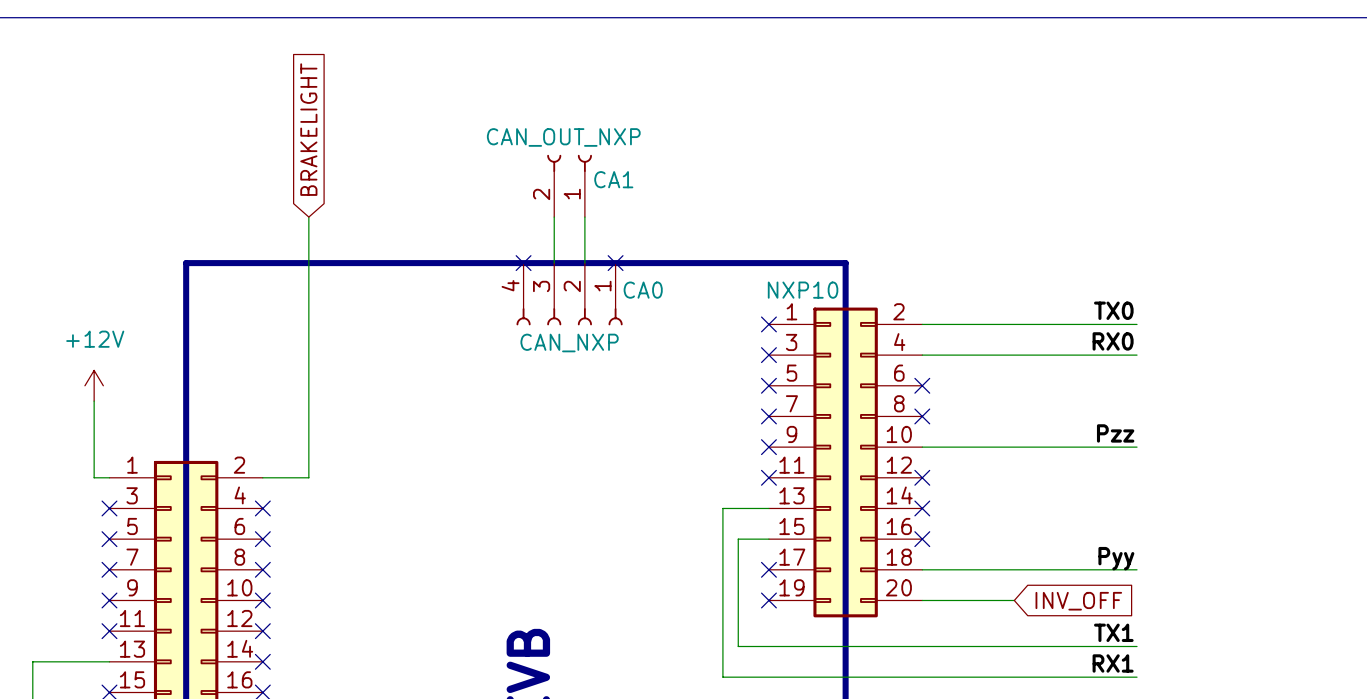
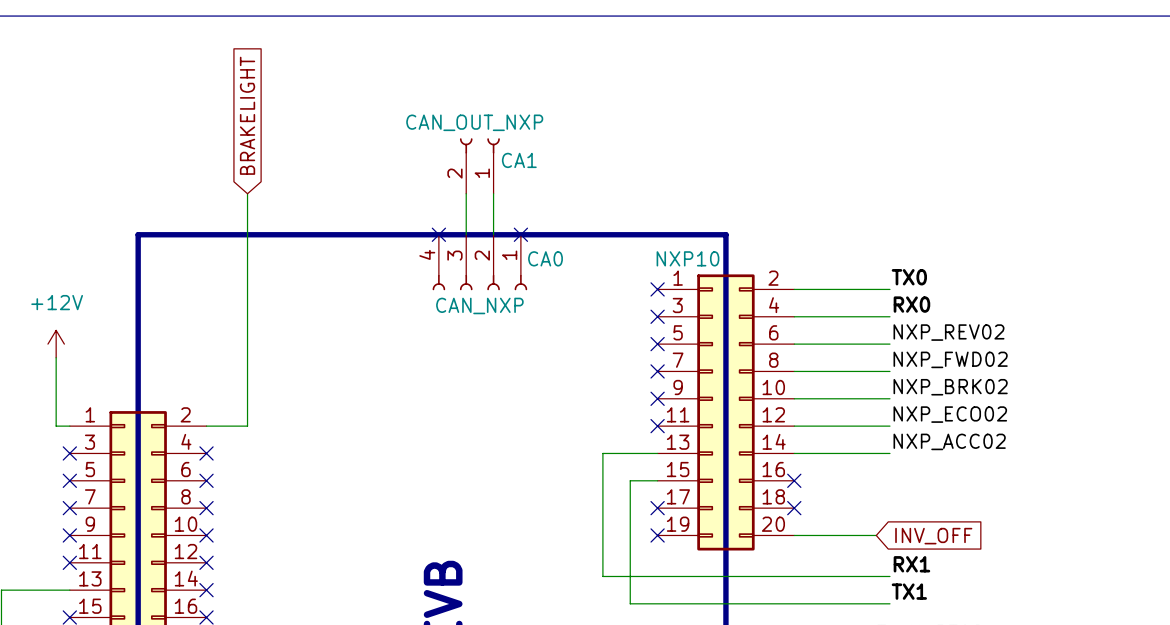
label position: TX0 (1113, 310) -> TX0 (909, 277)
wire: (1029, 324) (1137, 324) -> (794, 344) (889, 344)
label position: RX0 (1113, 341) -> RX0 (911, 304)
wire: (1029, 355) (1137, 355) -> (794, 371) (889, 371)
label: none -> NXP_REV02 (948, 332)
no-connect mark: (922, 385) -> none
label: none -> NXP_FWD02 (950, 359)
no-connect mark: (922, 416) -> none
label: Pzz (1115, 433) -> none
label: none -> NXP_BRK02 (950, 387)
wire: (1029, 447) (1137, 447) -> (794, 453) (889, 453)
label: none -> NXP_ECO02 (950, 414)
no-connect mark: (922, 477) -> none
label: none -> NXP_ACC02 (949, 441)
wire: (722, 508) (722, 677) (738, 677) -> (616, 453) (602, 453) (602, 576) (630, 576) (630, 603)
no-connect mark: (922, 508) -> none
label: Pyy (1116, 558) -> none
wire: (922, 569) (1137, 569) -> none
no-connect mark: none -> (794, 508)
label position: TX1 (1113, 632) -> TX1 (909, 591)
wire: (1029, 646) (1137, 646) -> (794, 426) (889, 426)
label position: RX1 (1113, 663) -> RX1 (911, 564)
wire: (1029, 677) (1137, 677) -> none

